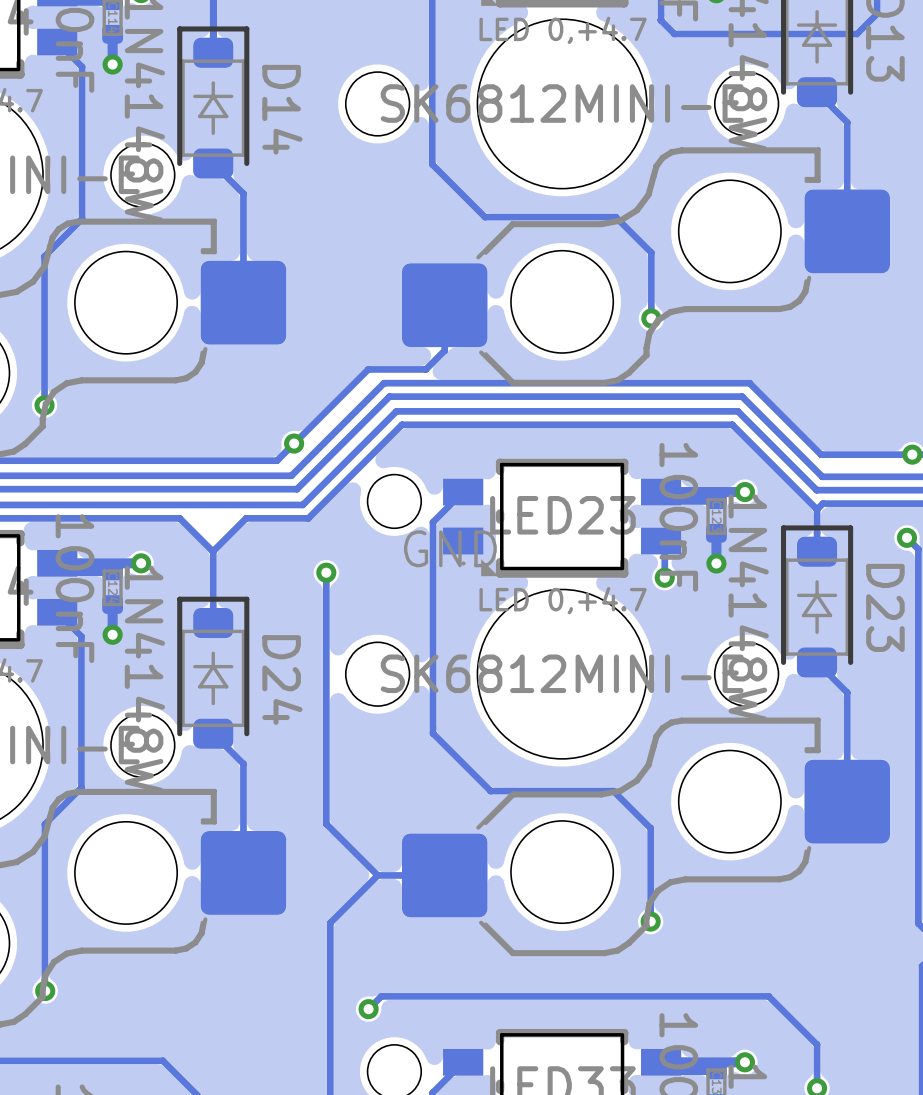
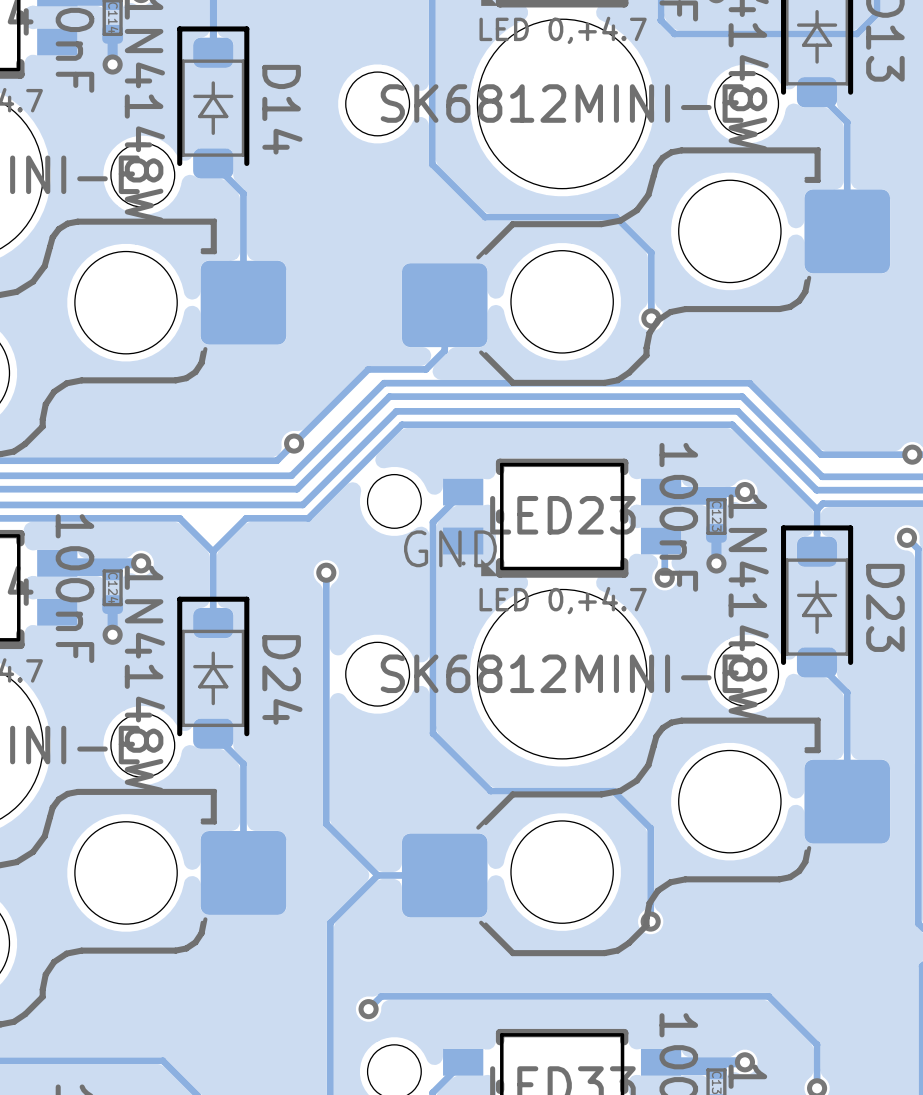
track: (57, 42) (82, 66) (82, 218) (44, 256) (44, 405) -> none
via: (44, 405) -> none
track: (57, 612) (81, 636) (81, 787) (44, 824) (44, 990) -> none
via: (45, 991) -> none

